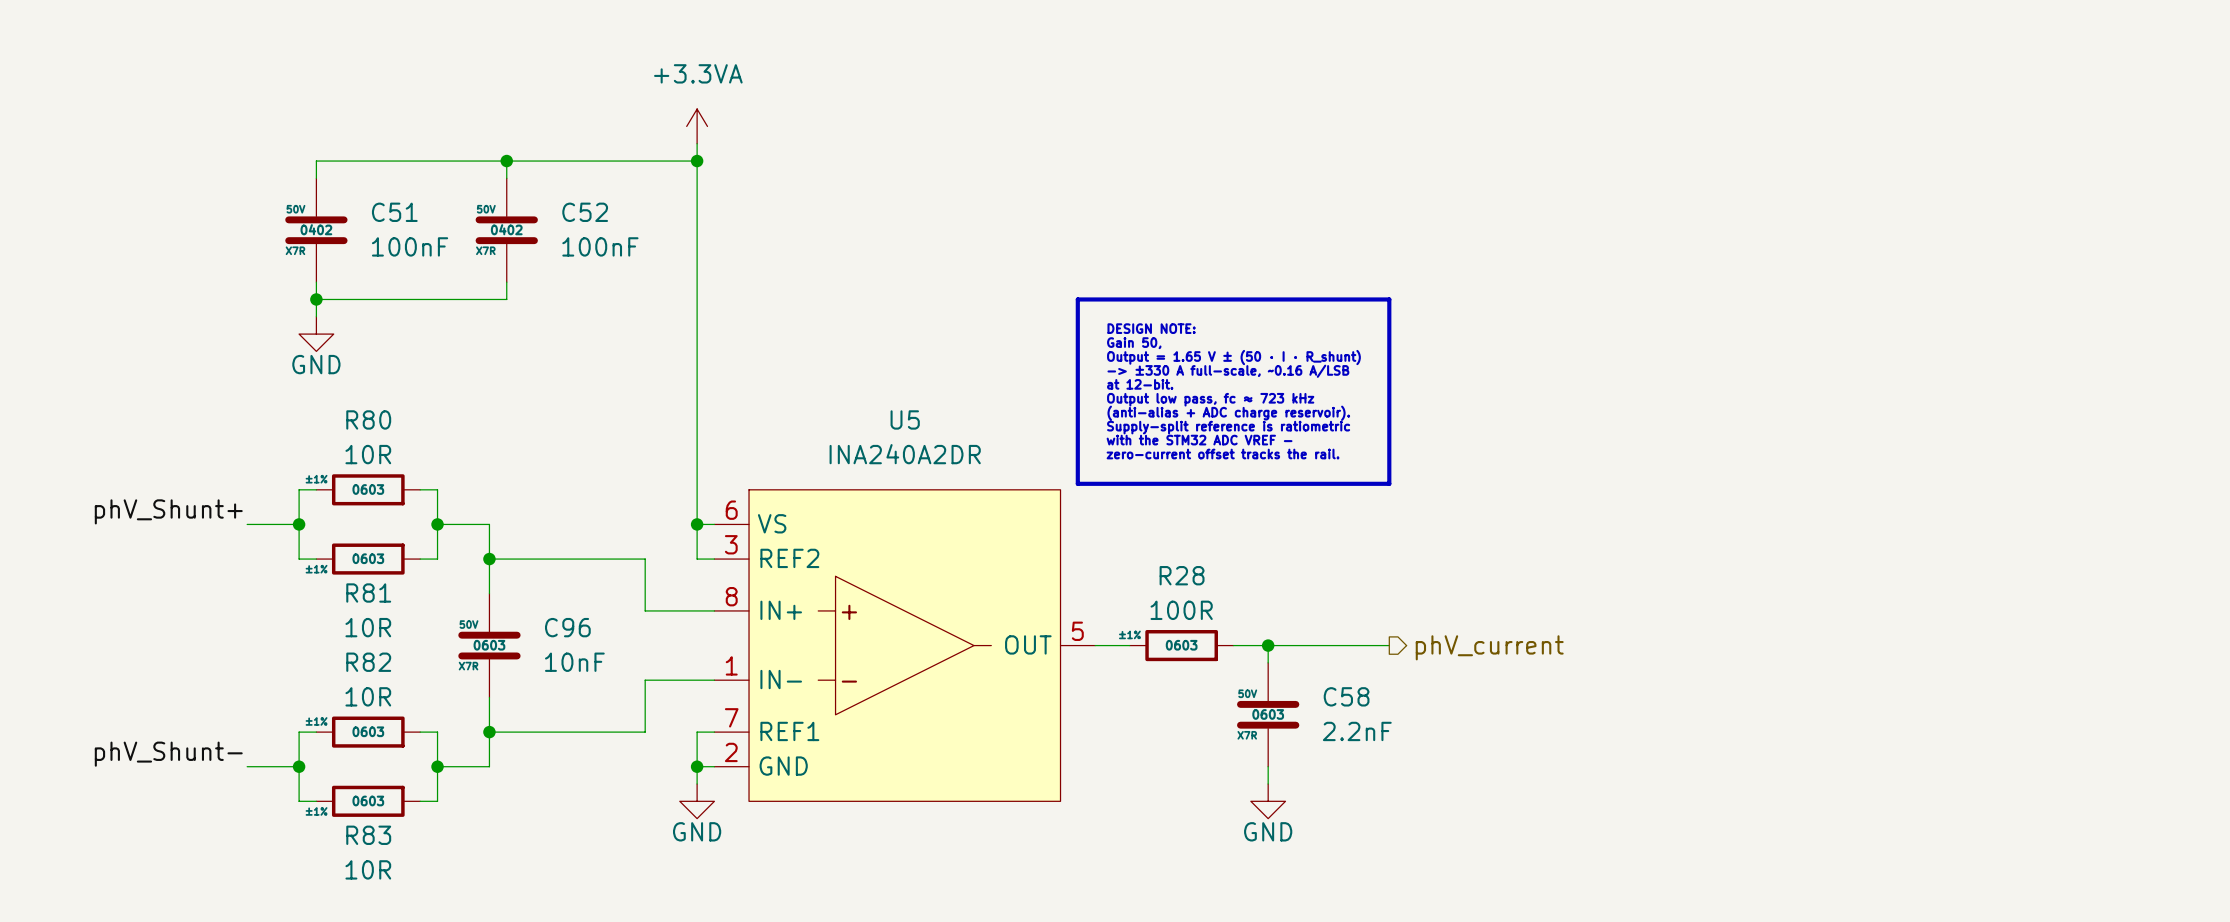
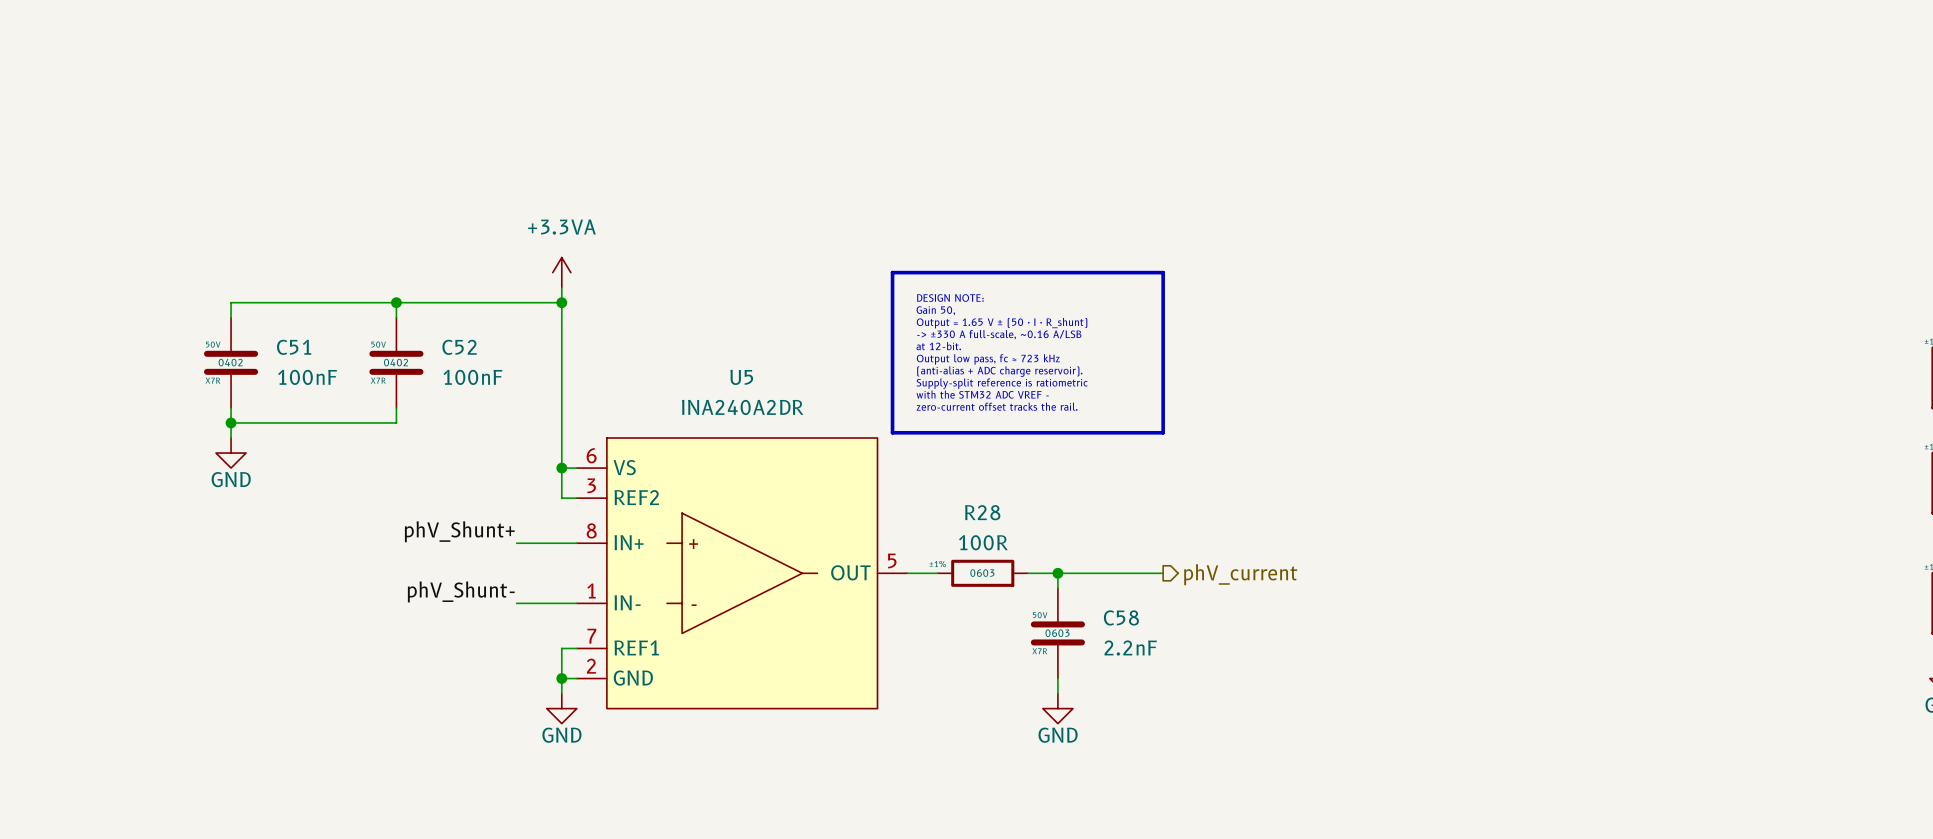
power symbol position: +3.3VA (697, 126) -> +3.3VA (561, 272)
wire: (697, 143) (697, 316) -> none
wire: (506, 161) (506, 178) -> (396, 302) (396, 317)
junction: (506, 161) -> none
wire: (697, 161) (316, 161) (316, 178) -> (561, 302) (231, 302) (231, 317)
junction: (697, 161) -> none
C51 position: (316, 230) -> (231, 362)
C52 position: (506, 230) -> (396, 362)
wire: (316, 282) (316, 316) -> none
wire: (506, 282) (506, 299) (316, 299) -> (396, 407) (396, 422) (231, 422)
junction: (316, 299) -> none
power symbol position: GND (316, 334) -> GND (231, 453)
junction: none -> (396, 302)
junction: none -> (561, 302)
wire: (316, 489) (299, 489) (299, 559) (316, 559) -> (231, 438) (231, 407)
R80: 10R (368, 489) -> none
wire: (420, 489) (437, 489) (437, 559) (420, 559) -> none
label: phV_Shunt+ (168, 511) -> none
wire: (247, 524) (299, 524) -> none
junction position: (299, 524) -> (231, 422)
wire: (437, 524) (489, 524) (489, 593) -> none
junction: (437, 524) -> none
R81: 10R (368, 559) -> none
wire: (489, 559) (645, 559) (645, 610) -> none
junction: (489, 559) -> none
label: none -> phV_Shunt+ (459, 531)
C96: 10nF (489, 645) -> none
label: none -> phV_Shunt- (461, 591)
wire: (645, 680) (645, 732) (489, 732) -> none
wire: (489, 697) (489, 766) (437, 766) -> none
wire: (316, 732) (299, 732) (299, 801) (316, 801) -> none
R82: 10R (368, 732) -> none
wire: (420, 732) (437, 732) (437, 801) (420, 801) -> none
junction: (489, 732) -> none
label: phV_Shunt- (168, 754) -> none
wire: (247, 766) (299, 766) -> none
junction: (299, 766) -> none
junction: (437, 766) -> none
R83: 10R (368, 801) -> none

